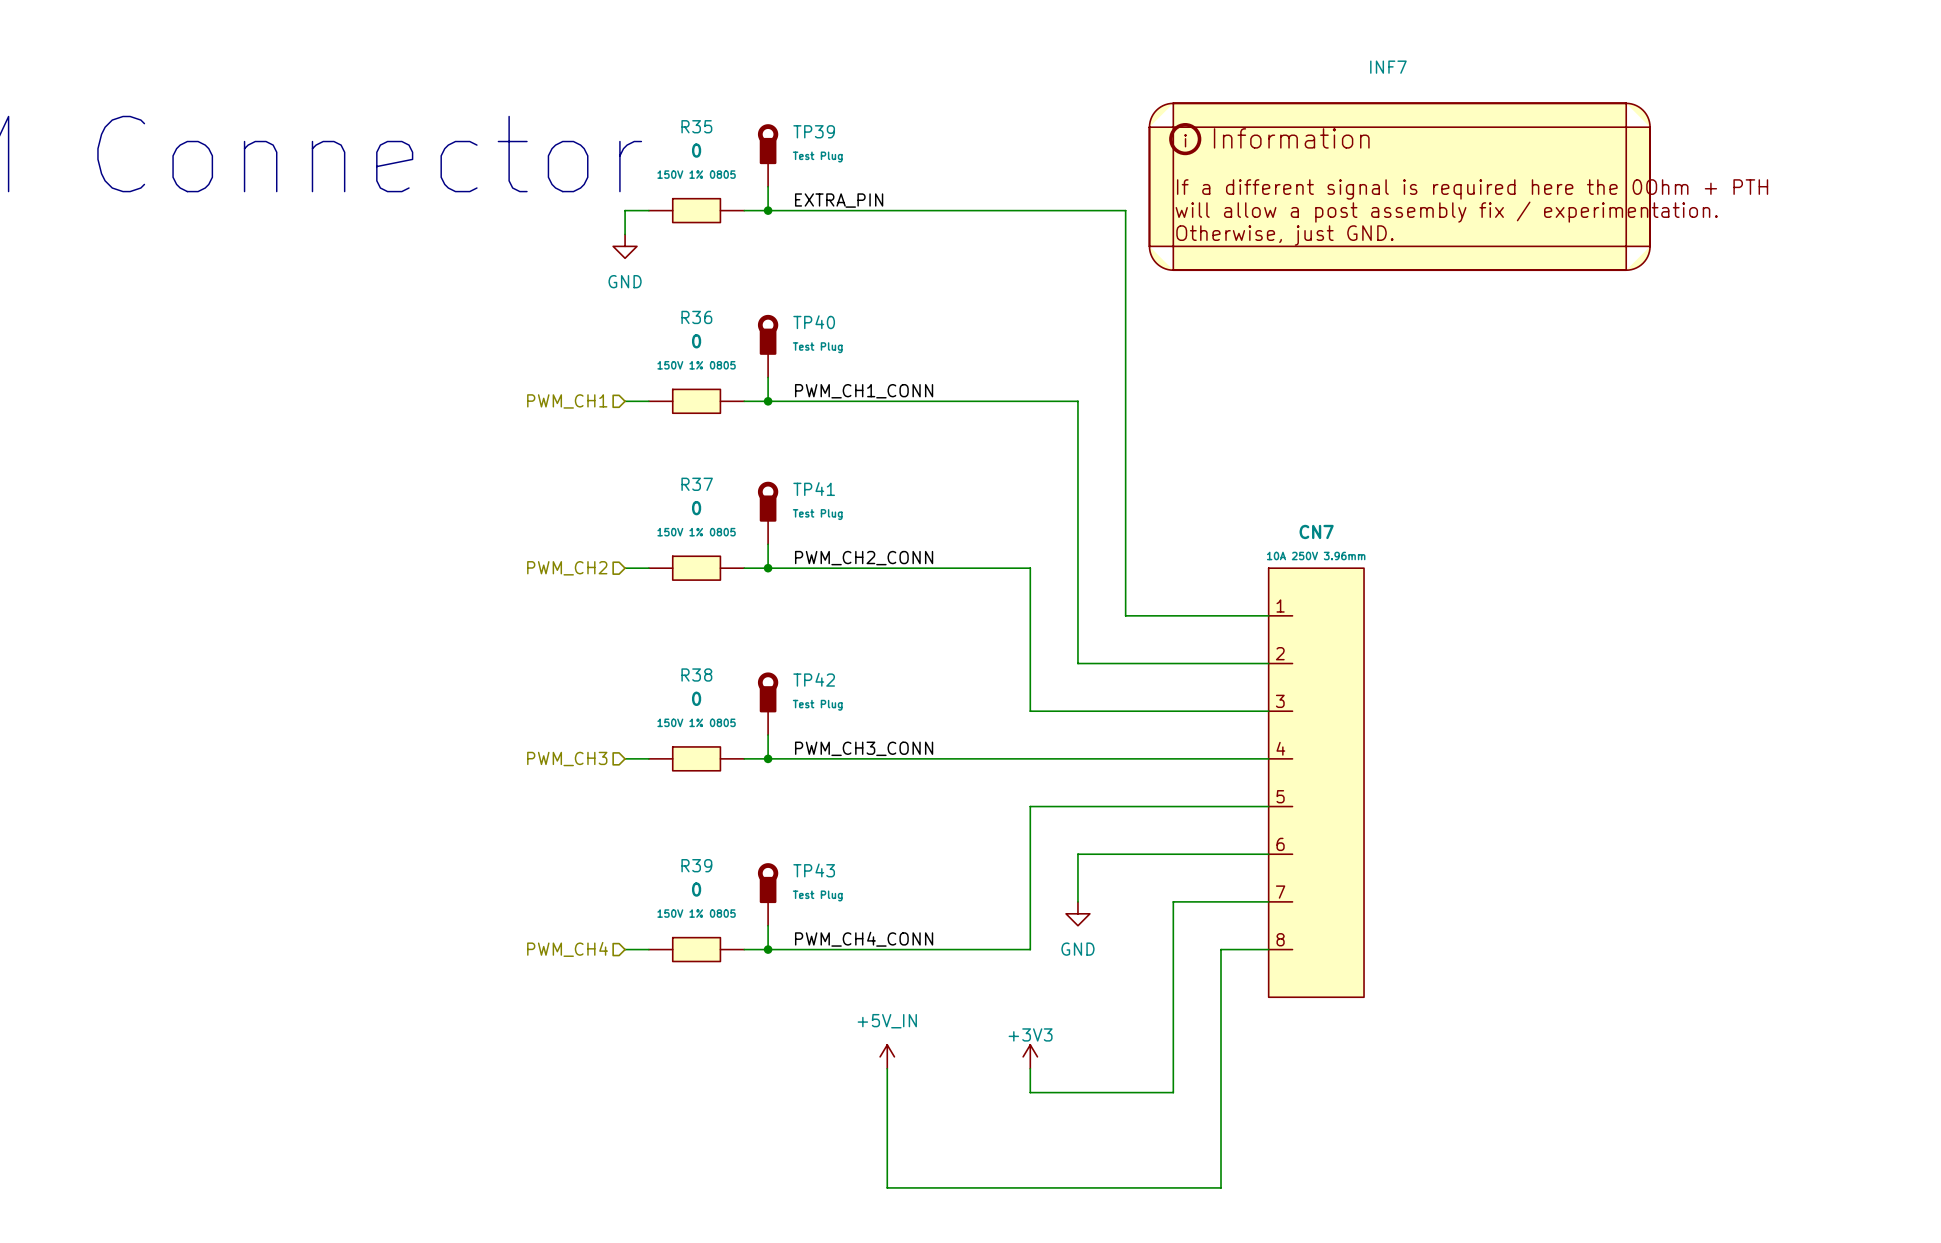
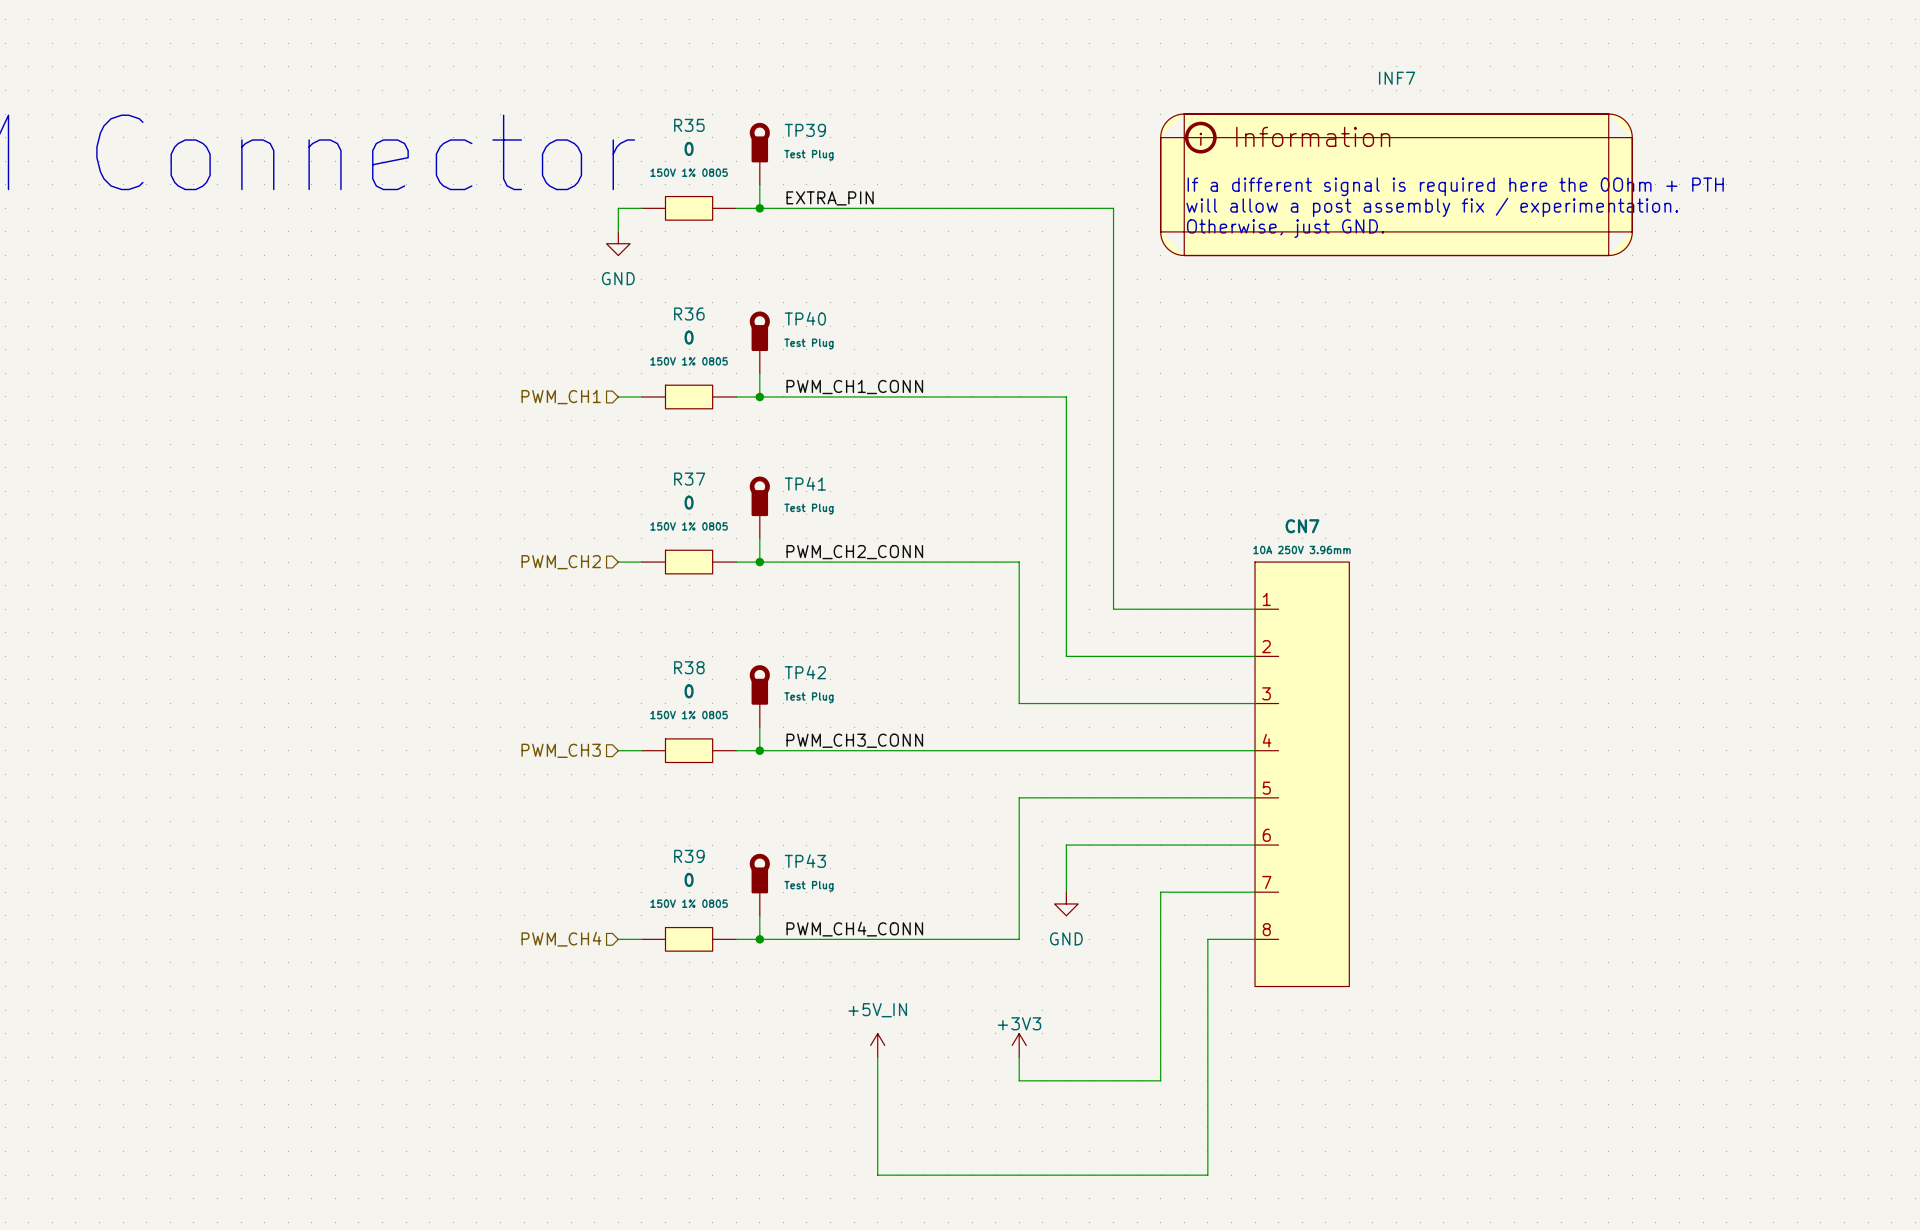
INF7 symbol: [1149, 103, 1651, 271] -> [1160, 114, 1633, 256]
text: none -> If a different signal is required here the 0Ohm + PTH (1455, 186)
text: none -> will allow a post assembly fix / experimentation. (1432, 207)
text: none -> Otherwise, just GND. (1285, 228)

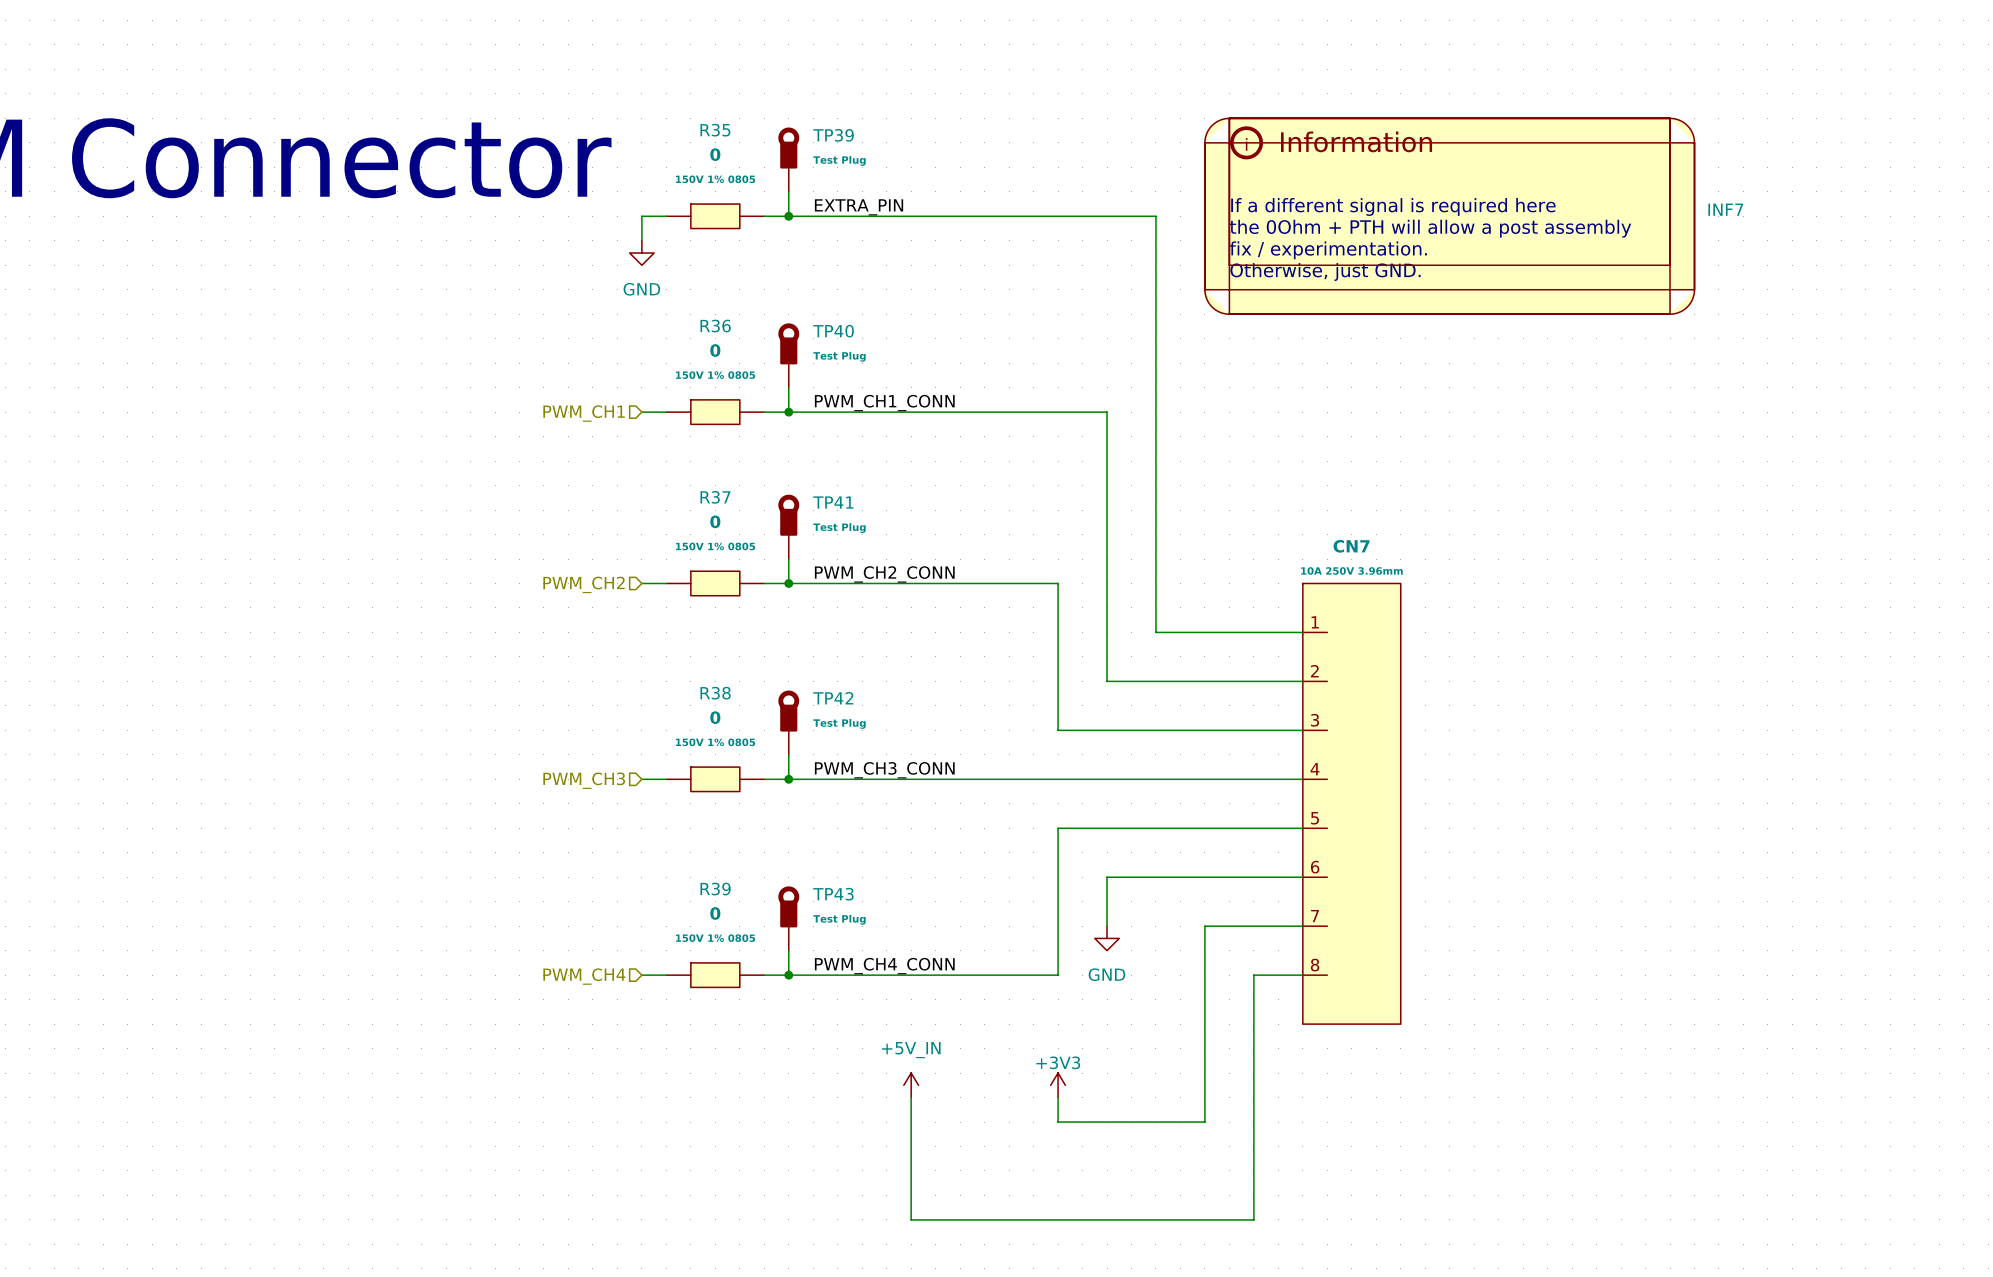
INF7 name position: INF7 (1397, 78) -> INF7 (1725, 209)
INF7 symbol: [1160, 114, 1633, 256] -> [1204, 118, 1695, 315]
text: If a different signal is required here the 0Ohm + PTH (1455, 186) -> If a different signal is required here (1393, 206)
text: will allow a post assembly fix / experimentation. (1432, 207) -> none
text: none -> the 0Ohm + PTH will allow a post assembly (1430, 228)
text position: Otherwise, just GND. (1285, 228) -> Otherwise, just GND. (1325, 272)
text: none -> fix / experimentation. (1328, 250)

